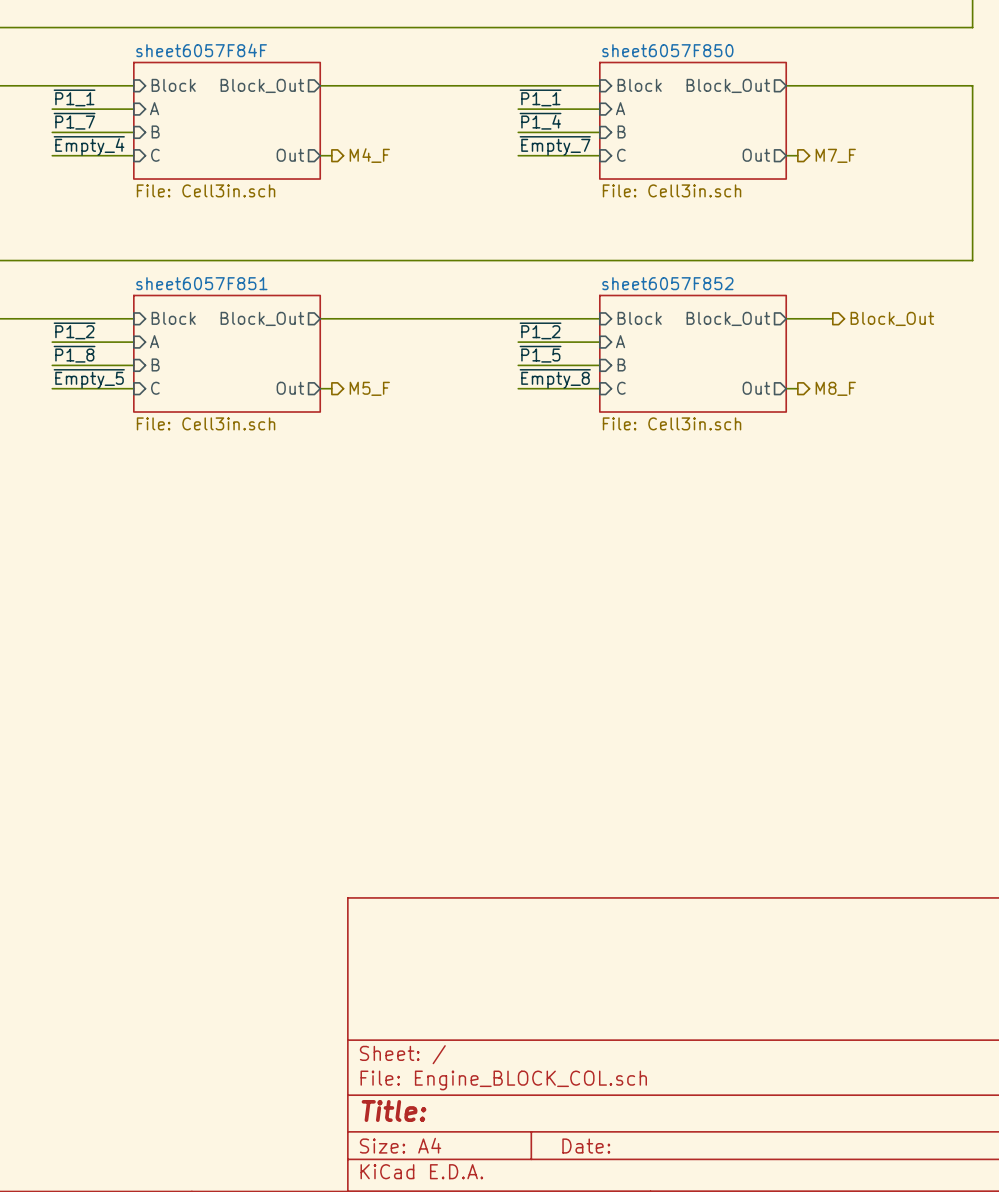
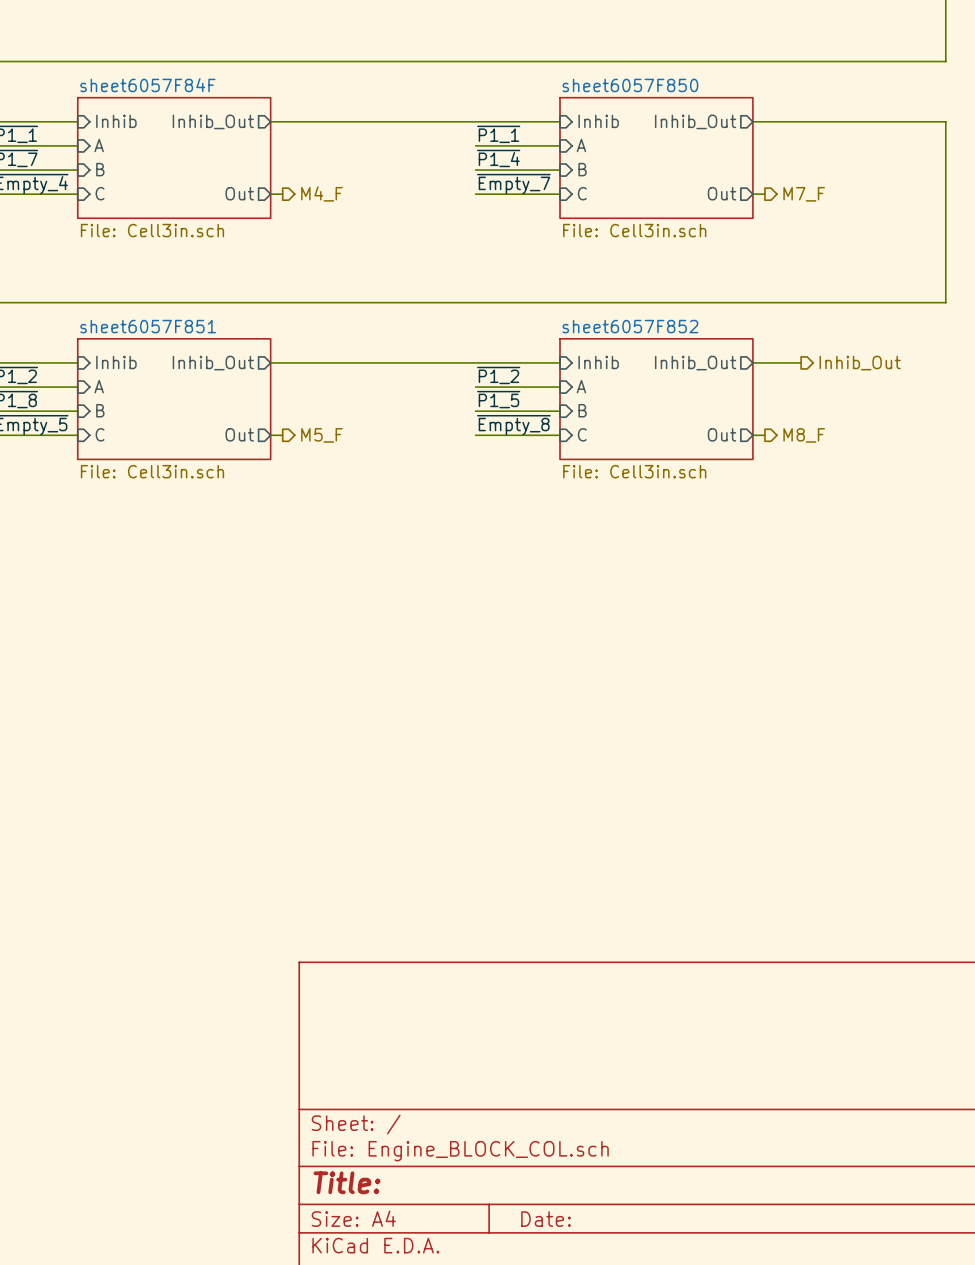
sheet pin: Block (173, 85) -> Inhib (116, 121)
sheet pin: Block_Out (262, 85) -> Inhib_Out (213, 121)
sheet pin: Block (639, 85) -> Inhib (598, 121)
sheet pin: Block_Out (728, 85) -> Inhib_Out (695, 121)
sheet pin: Block (173, 318) -> Inhib (116, 362)
sheet pin: Block_Out (262, 318) -> Inhib_Out (213, 363)
sheet pin: Block (639, 318) -> Inhib (598, 362)
sheet pin: Block_Out (728, 318) -> Inhib_Out (695, 363)
hierarchical label: Block_Out (892, 318) -> Inhib_Out (860, 363)

